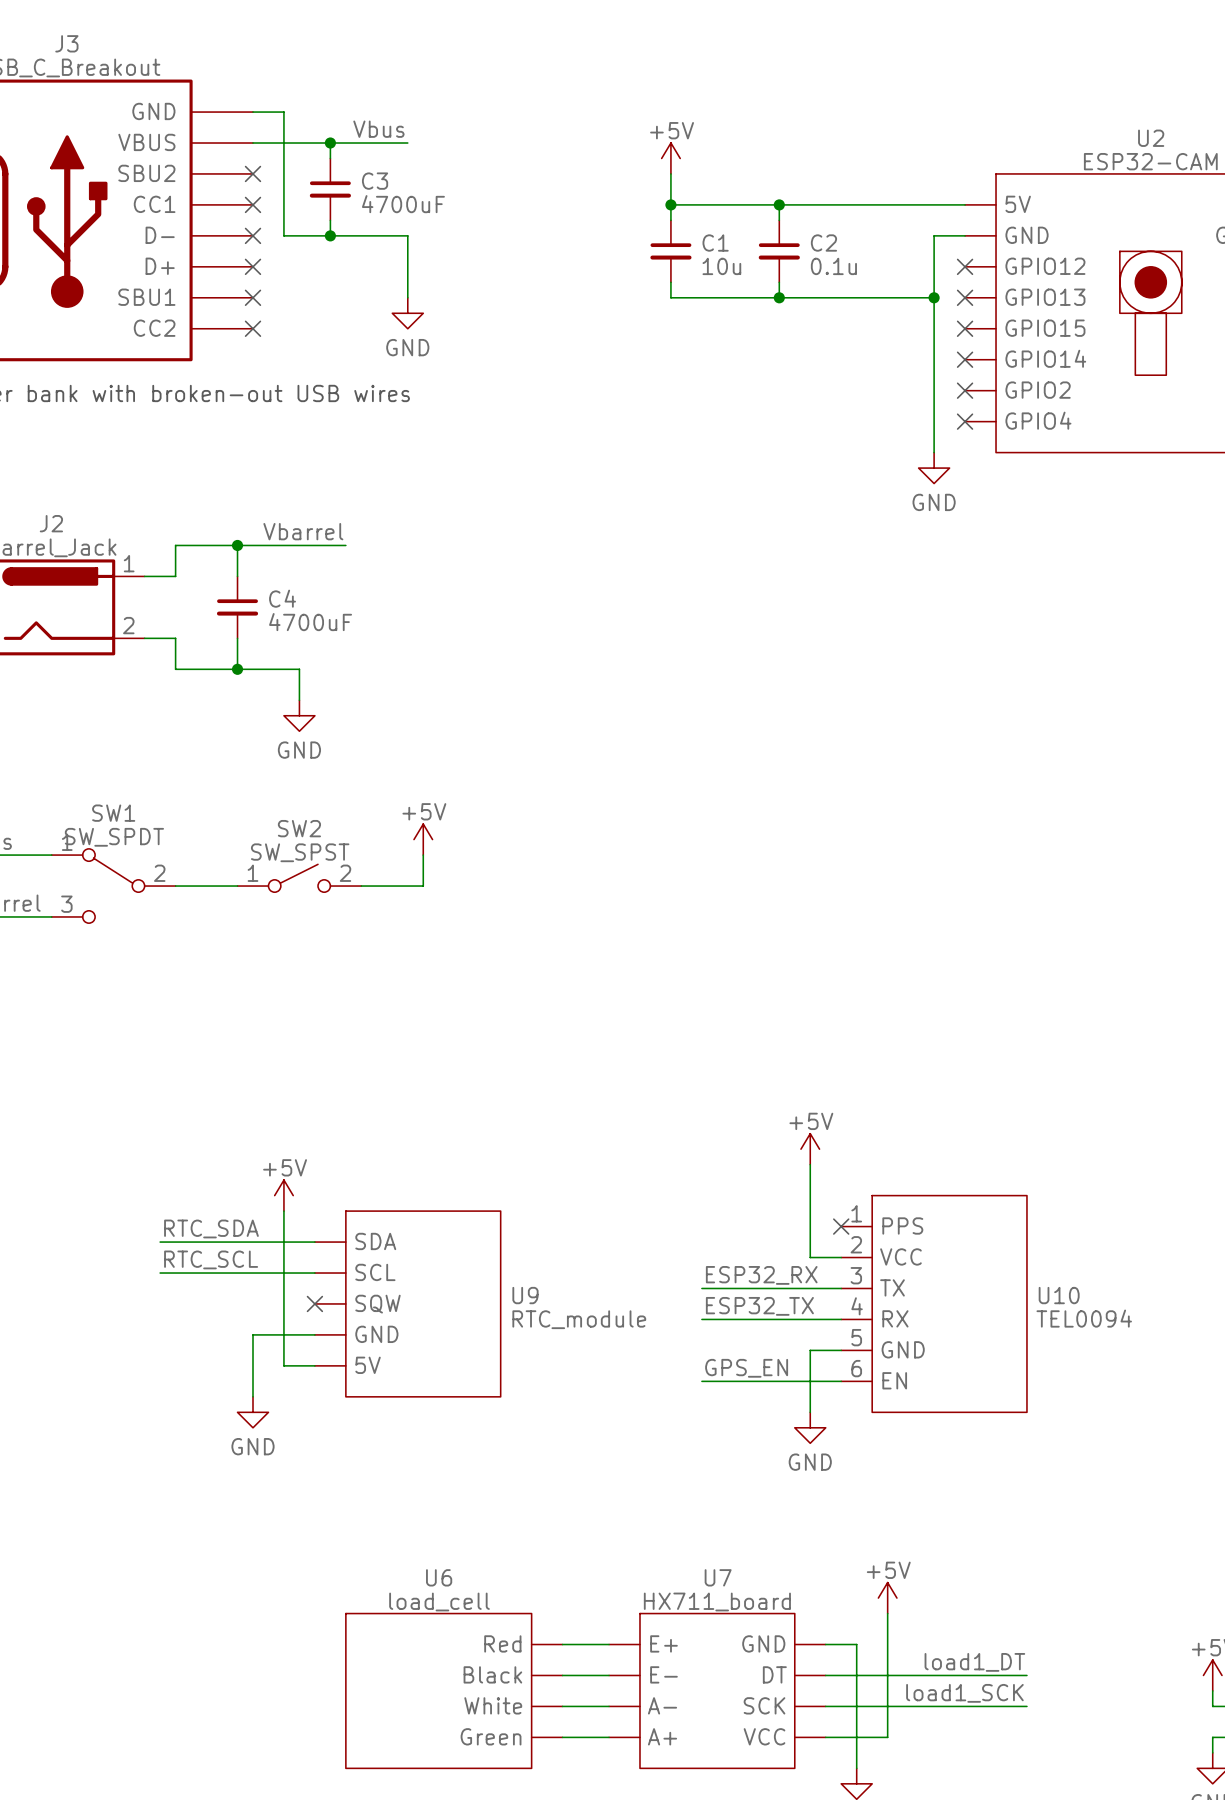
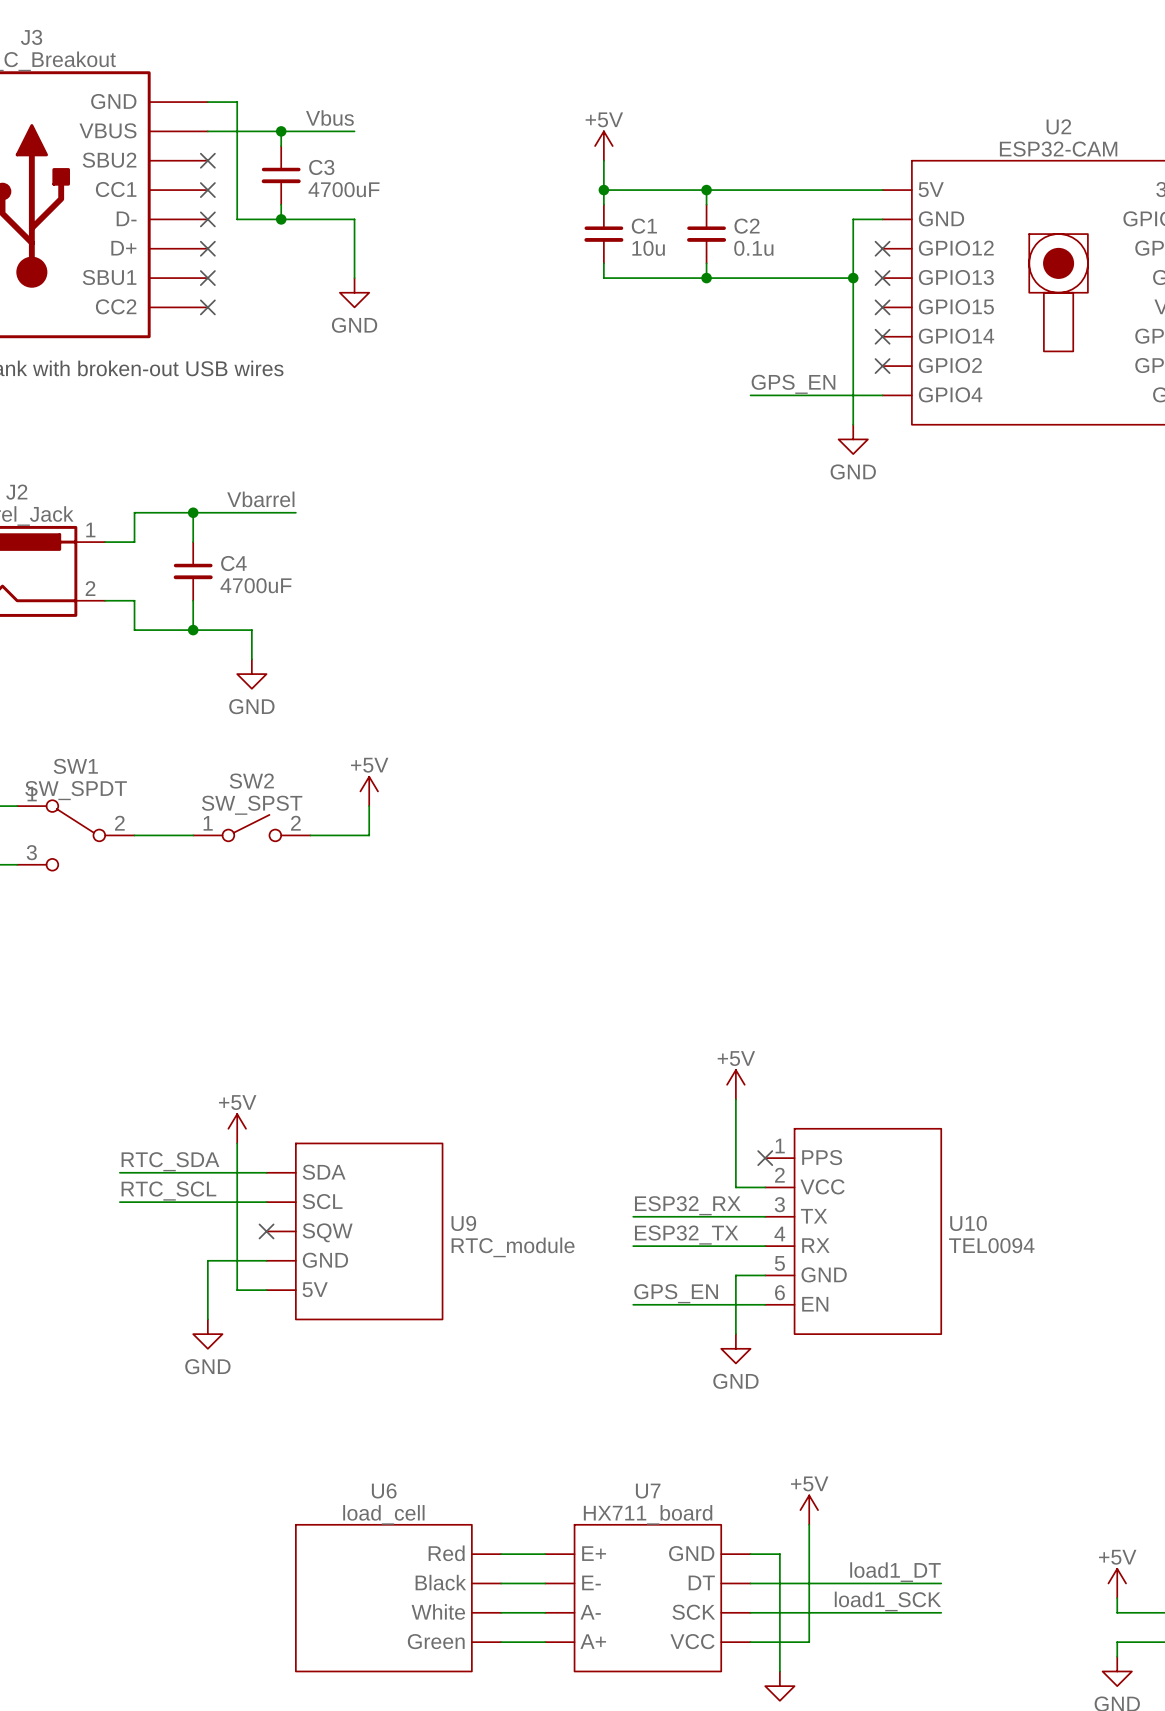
label: none -> GPS_EN (793, 384)
wire: none -> (750, 395) (882, 395)
no-connect mark: (965, 421) -> none

